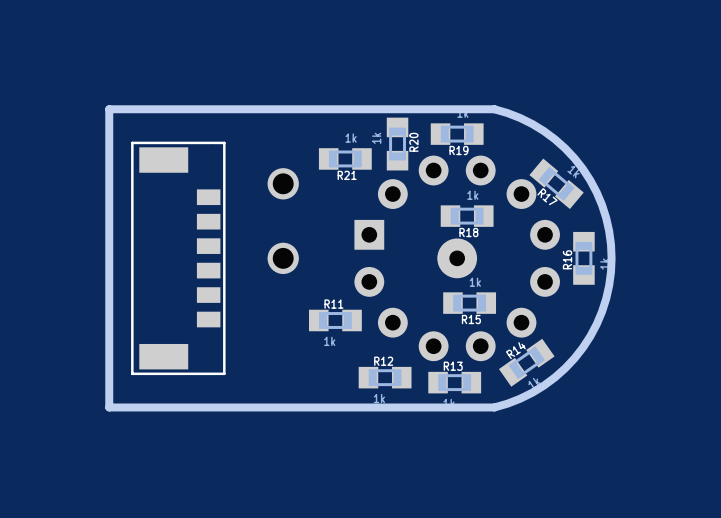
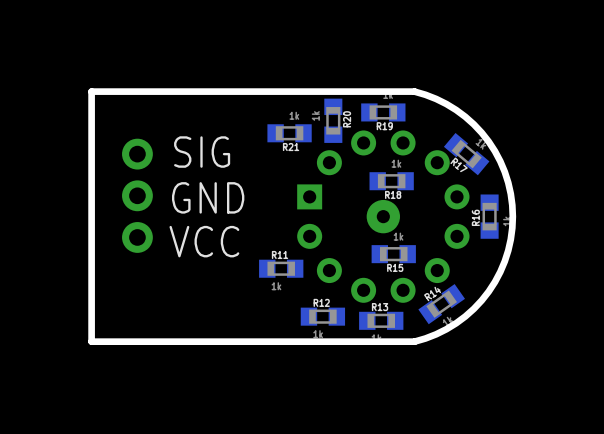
text: none -> SIG (202, 152)
part: (283, 221) -> none
part: none -> (137, 195)
text: none -> GND (208, 197)
part: (178, 258) -> none
text: none -> VCC (204, 241)

